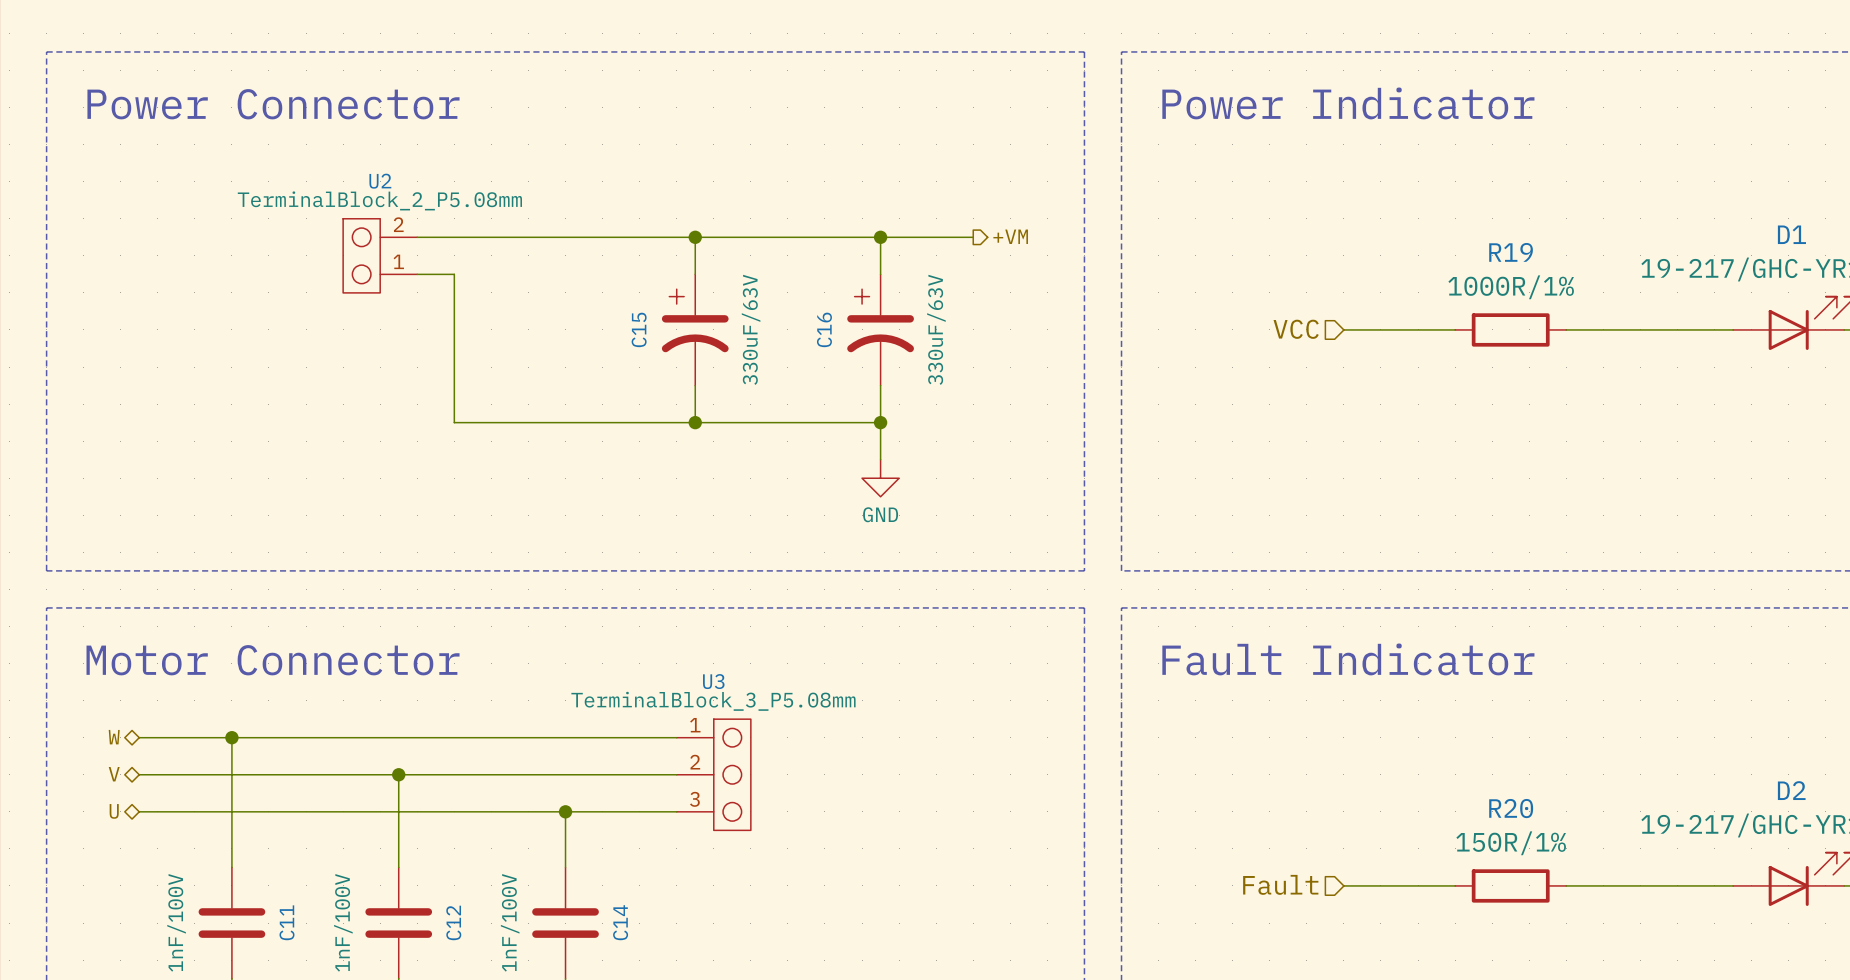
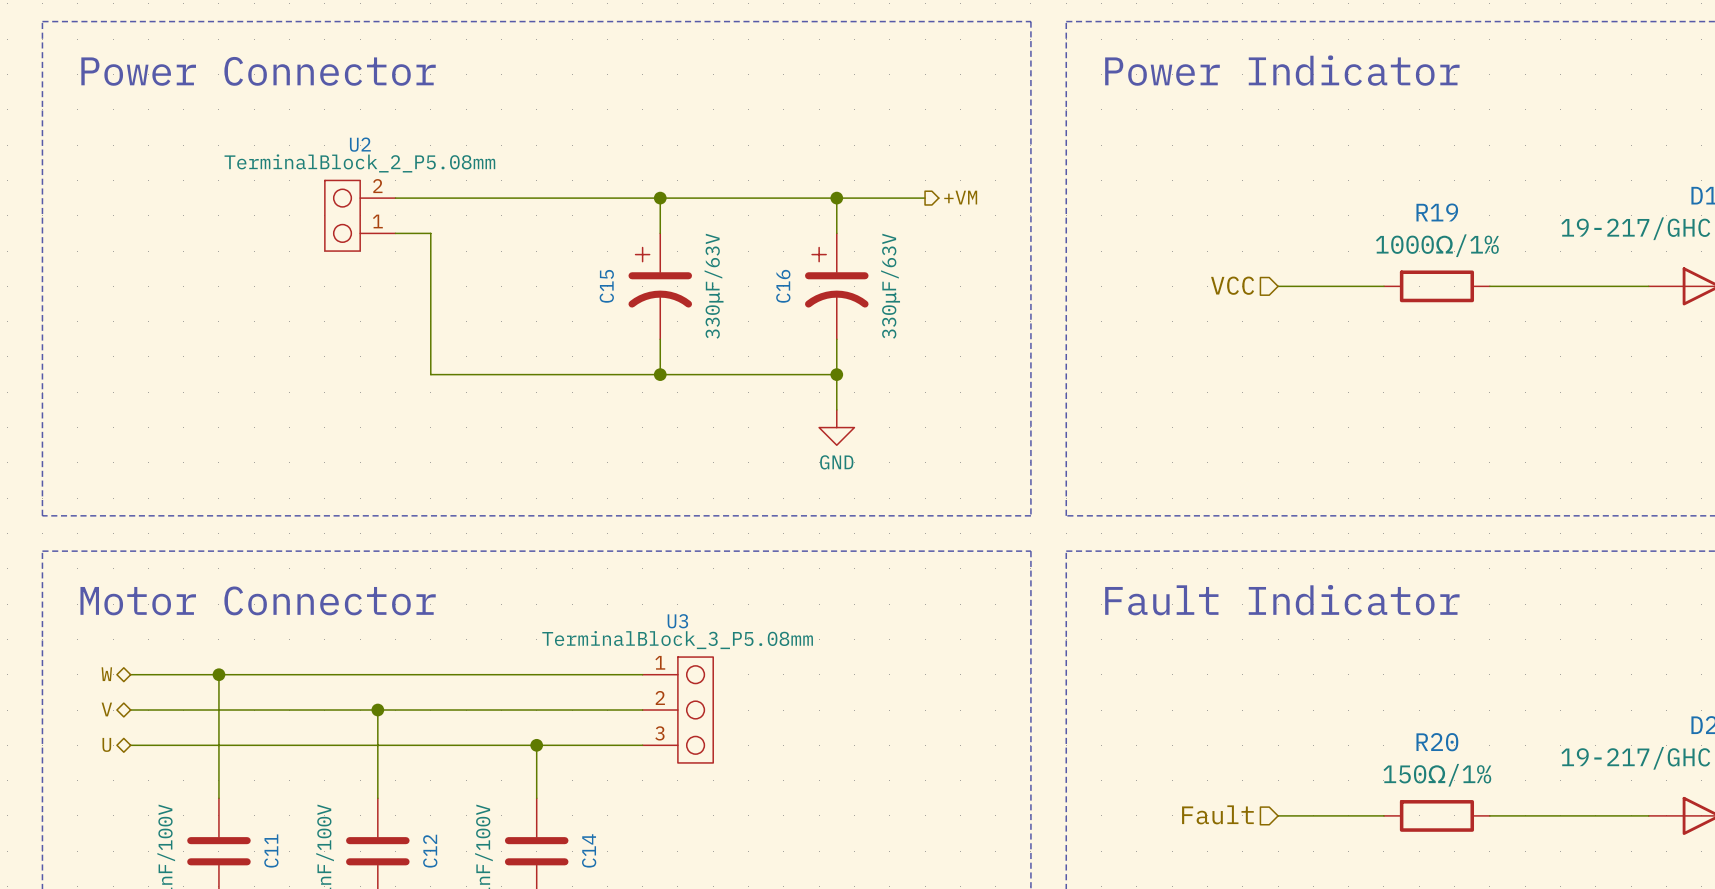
R19 value: 1000R/1% (1511, 287) -> 1000Ω/1% (1437, 245)
C15 value: 330uF/63V (751, 329) -> 330μF/63V (714, 286)
C16 value: 330uF/63V (936, 329) -> 330μF/63V (890, 286)
R20 value: 150R/1% (1511, 843) -> 150Ω/1% (1437, 775)

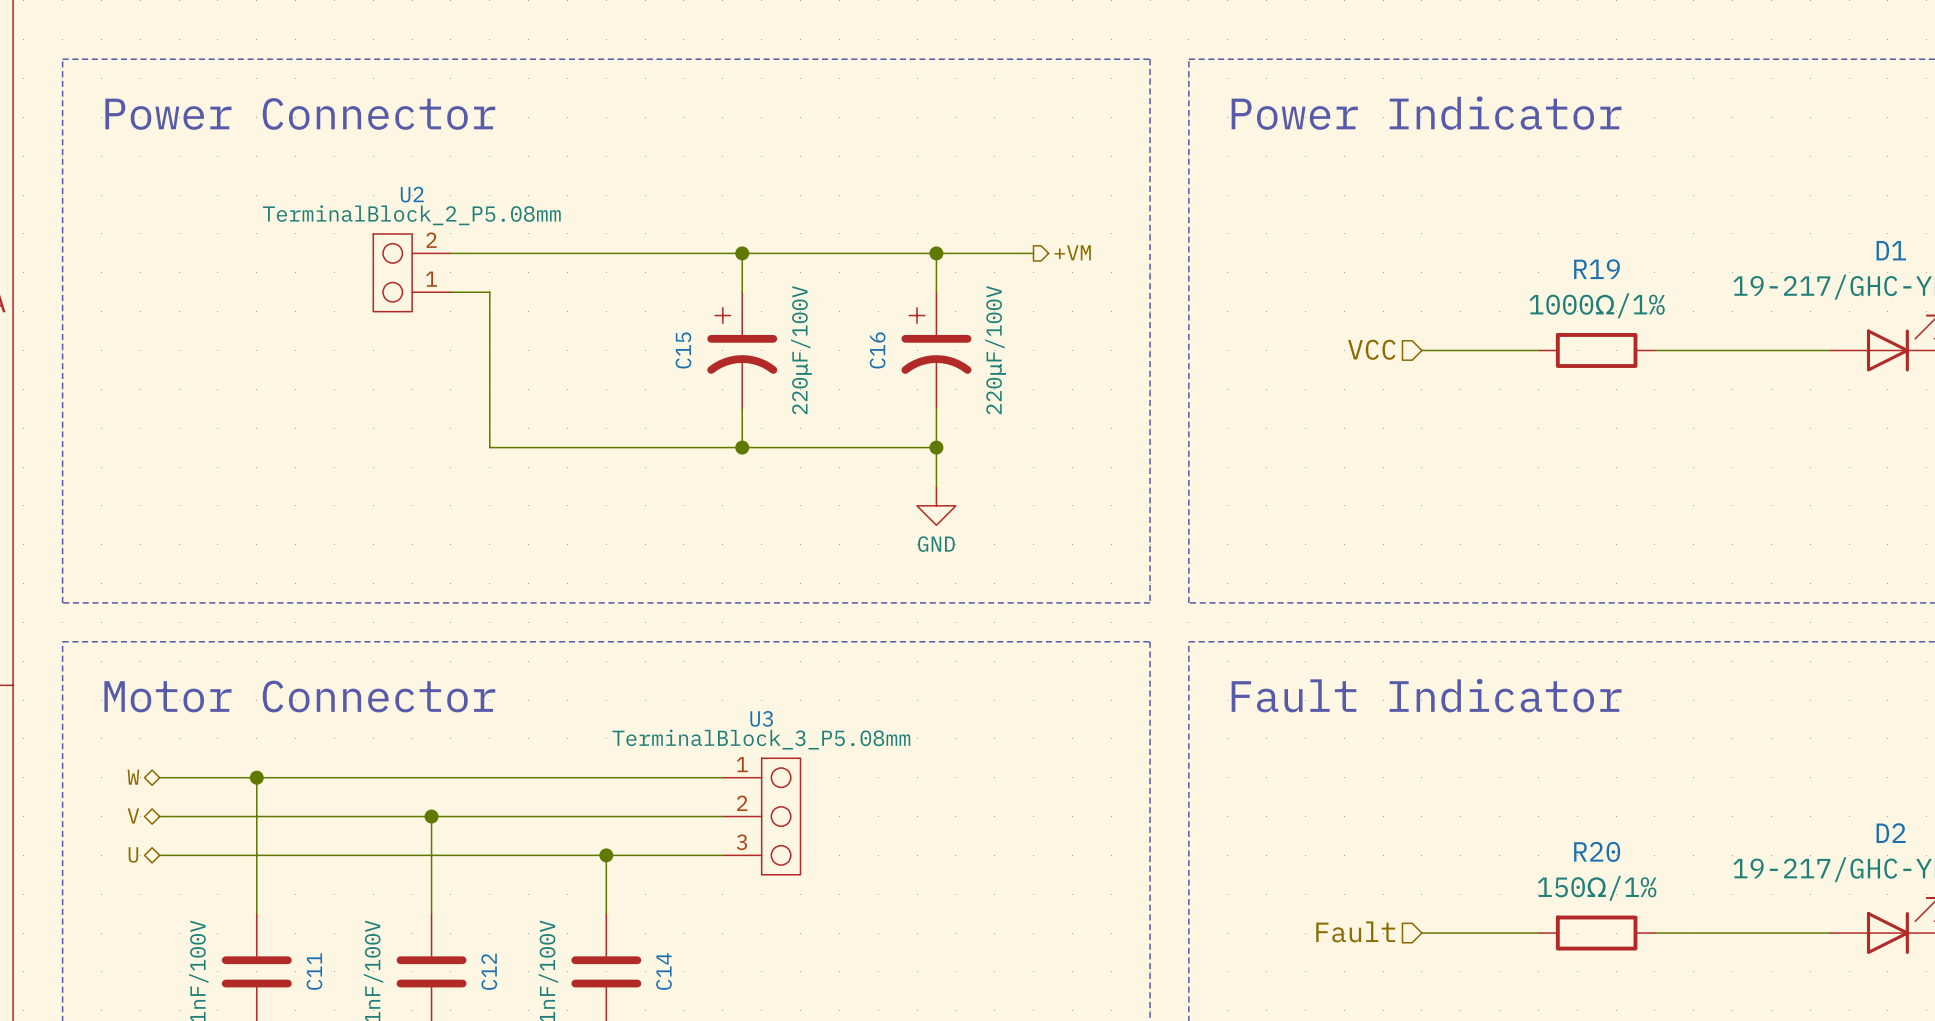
C15 value: 330μF/63V (714, 286) -> 220μF/100V (801, 350)
C16 value: 330μF/63V (890, 286) -> 220μF/100V (995, 350)

